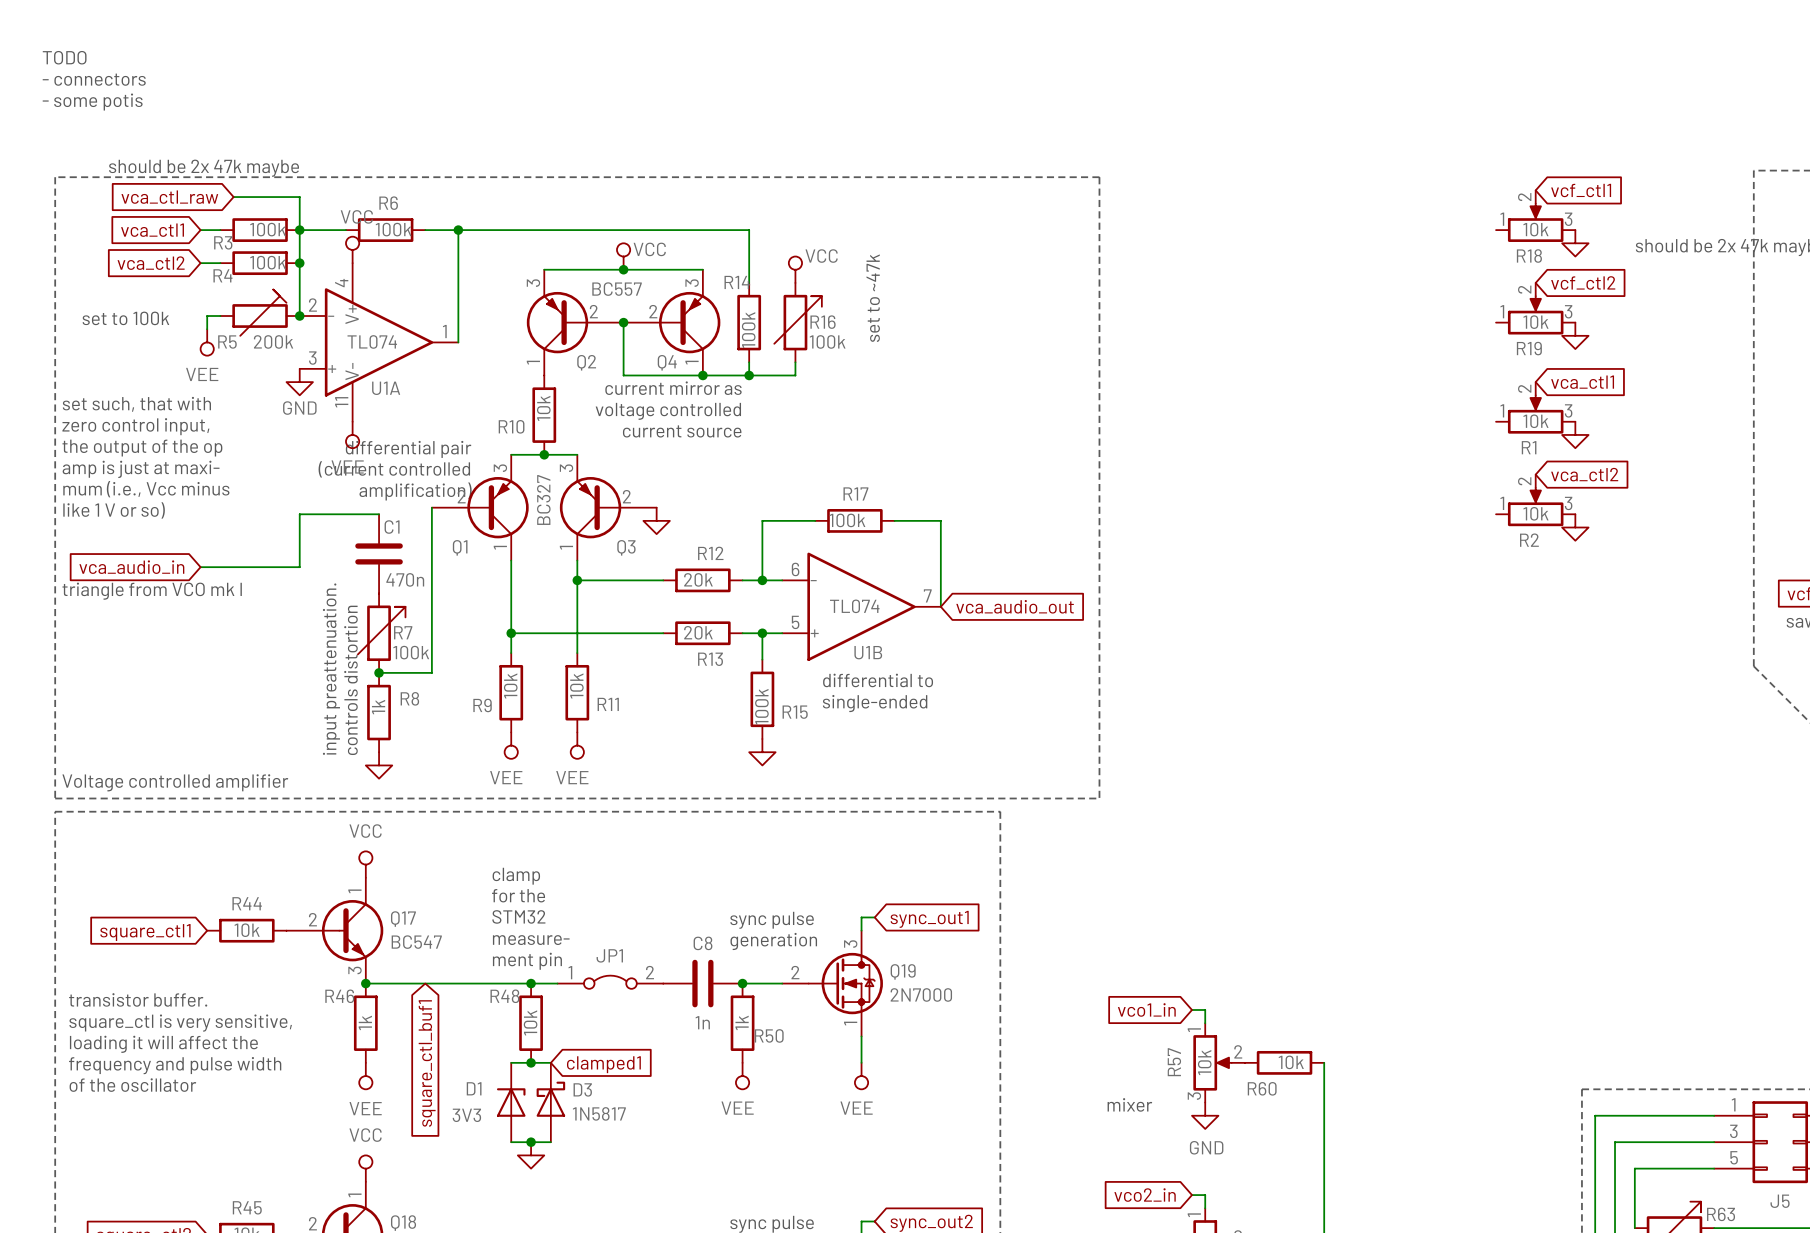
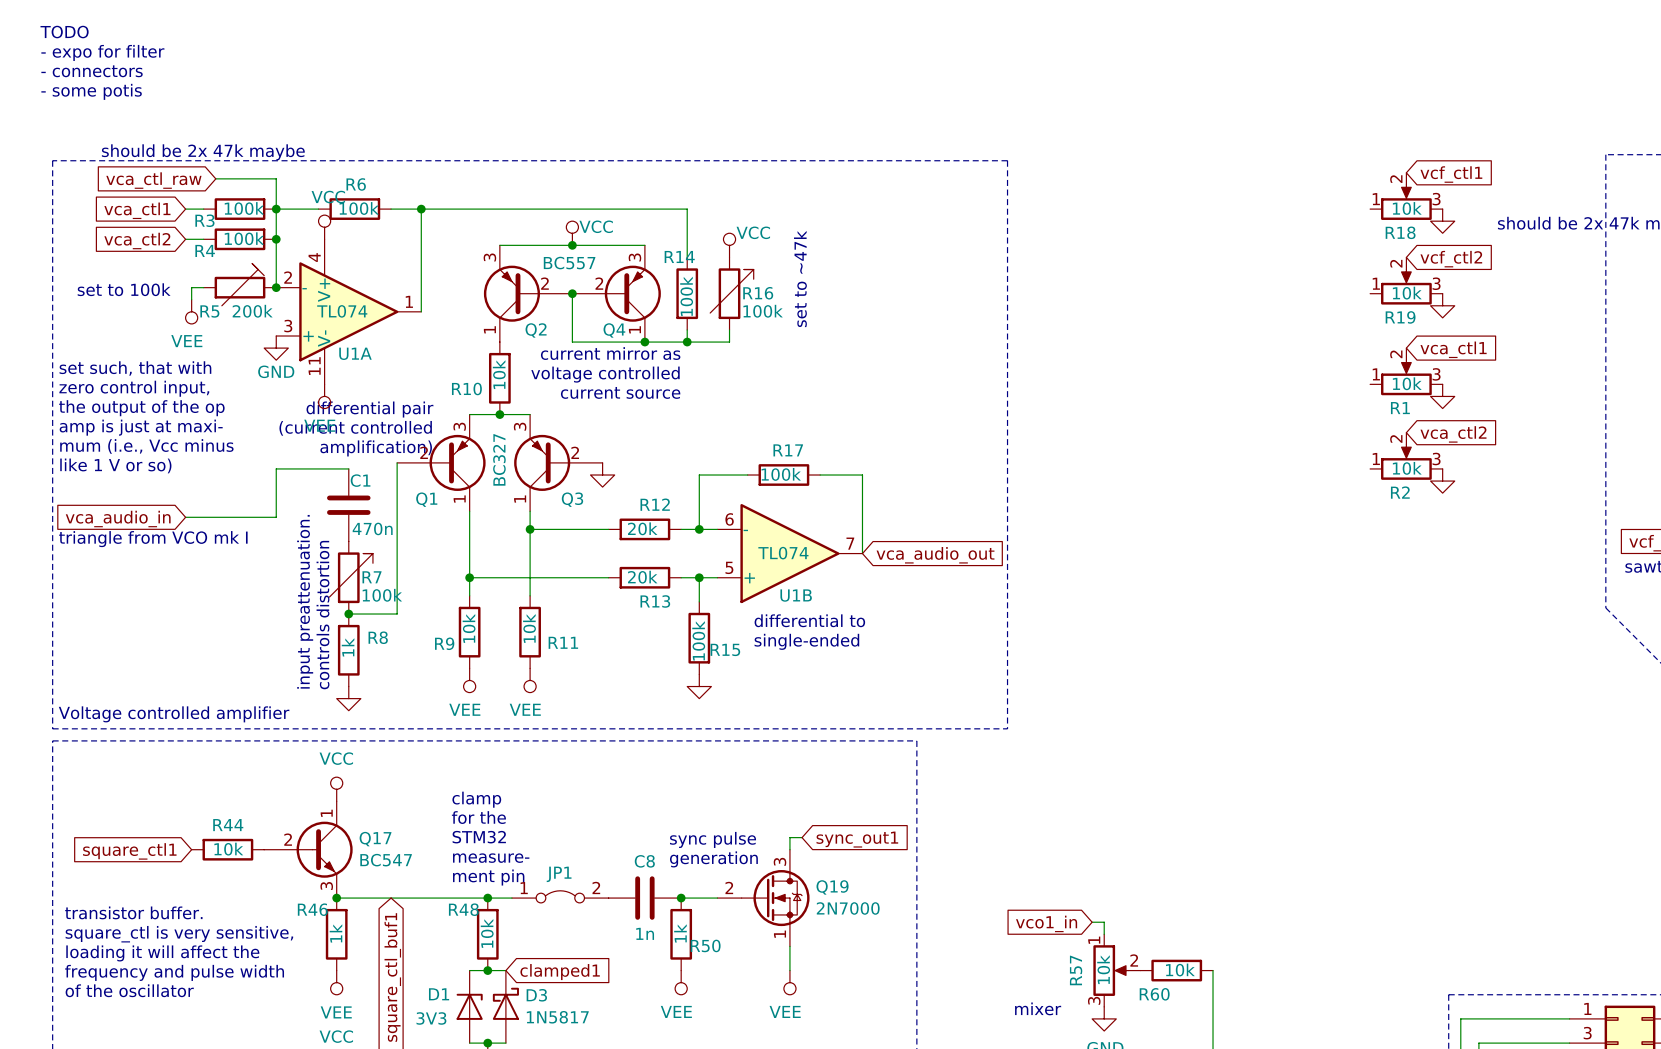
text: none -> TODO (64, 32)
text: TODO (64, 57) -> - expo for filter (102, 52)

